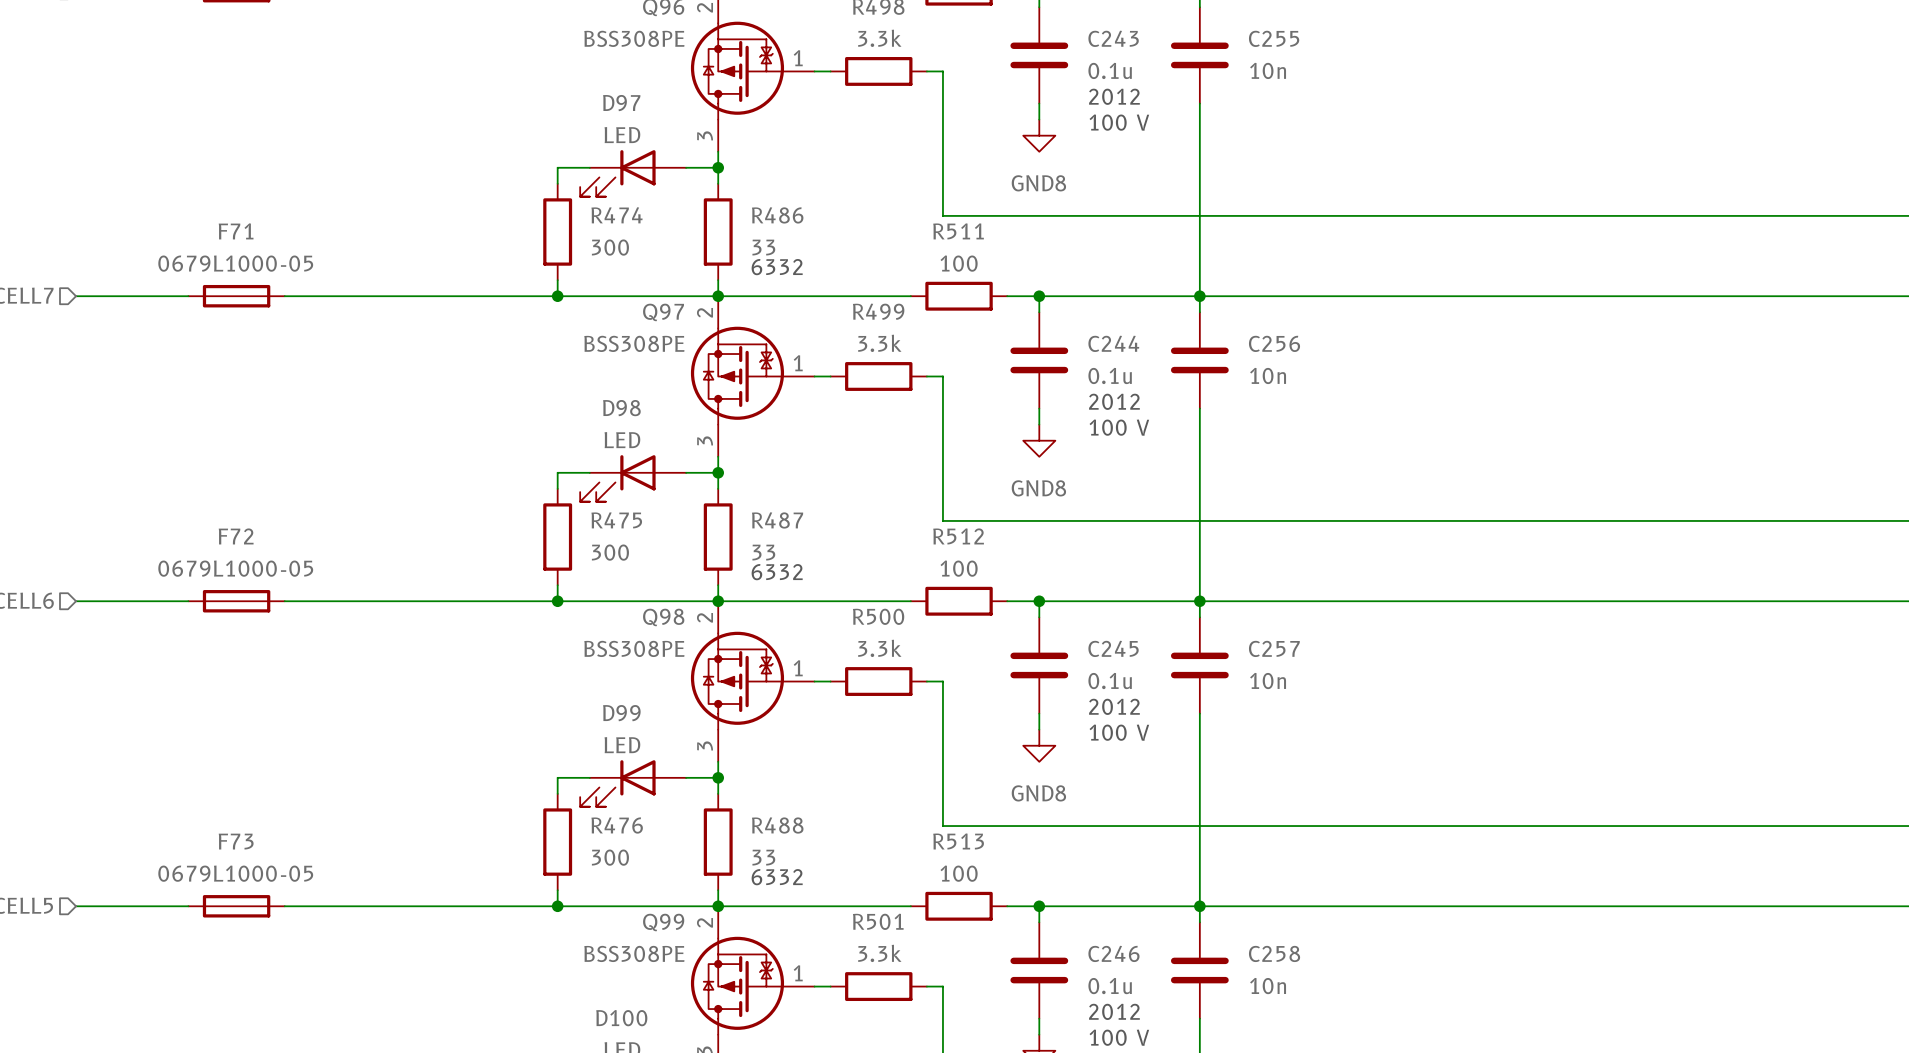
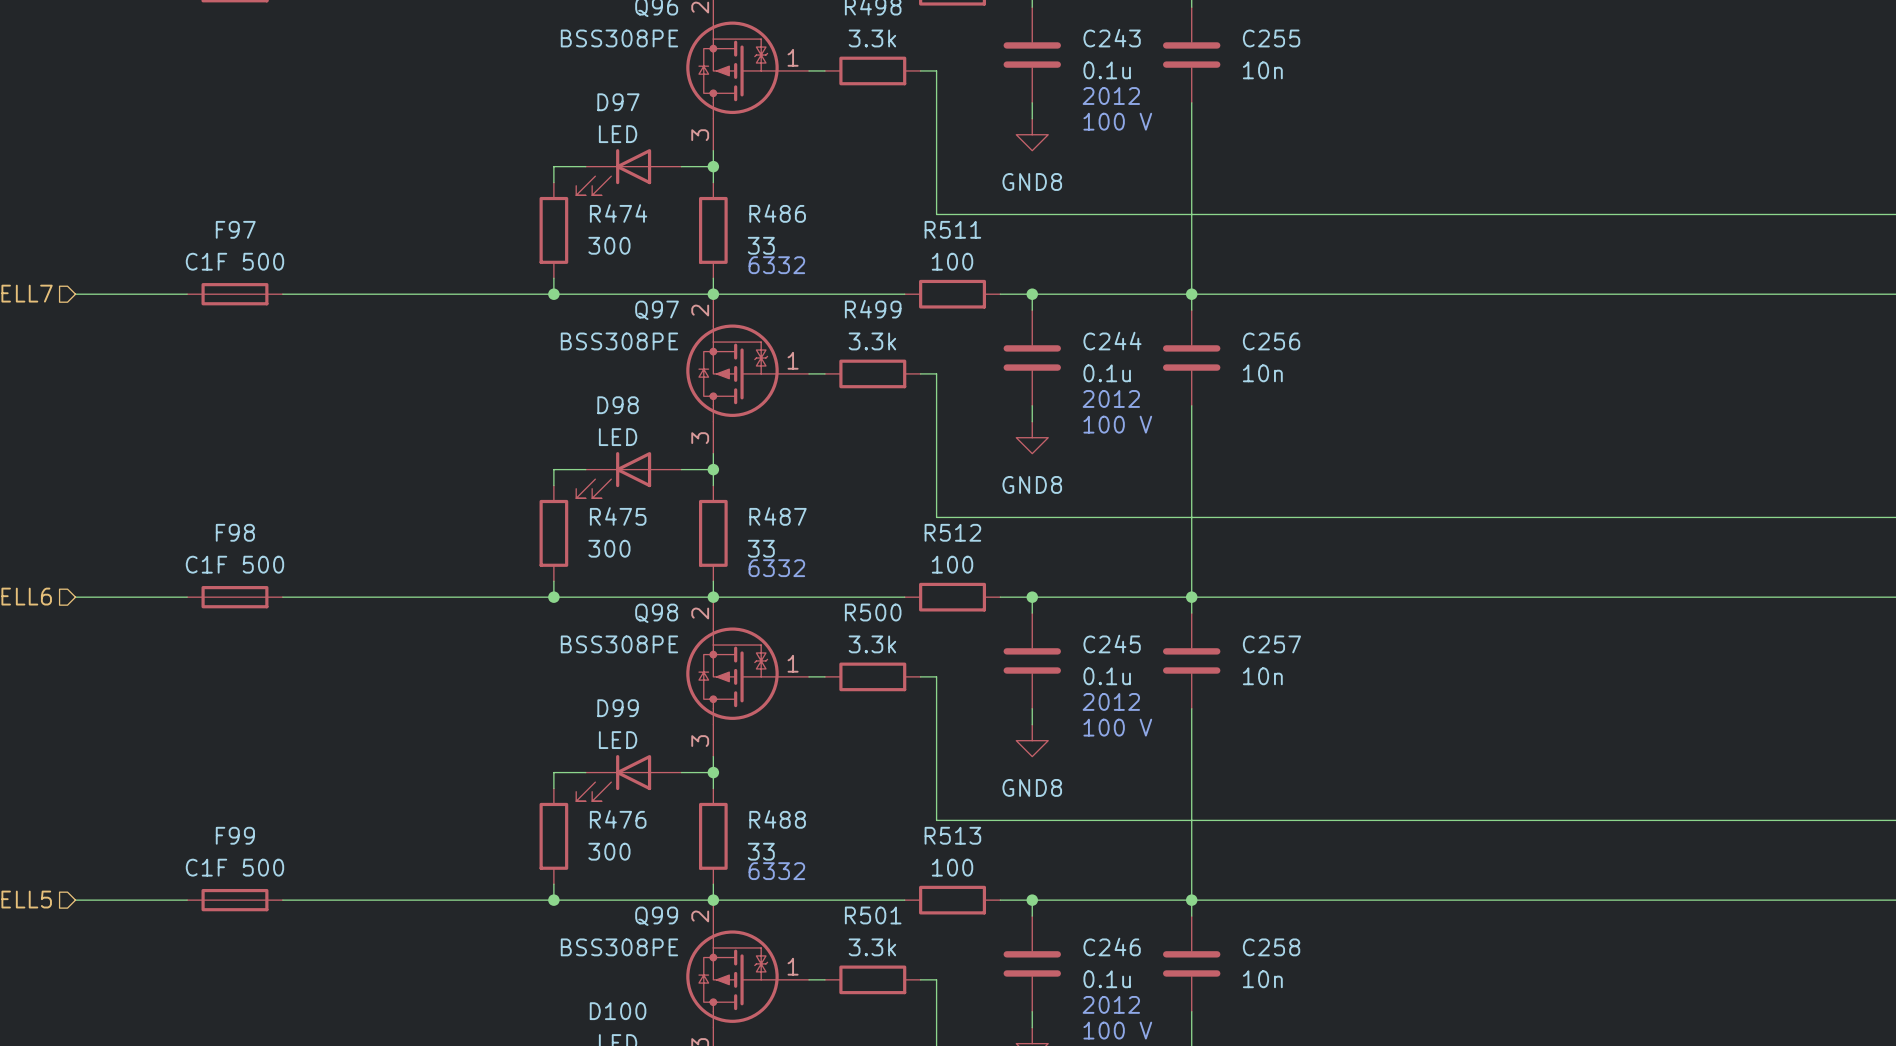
F71 name: F71 (236, 231) -> F97 (235, 229)
F71 value: 0679L1000-05 (235, 263) -> C1F 500 (234, 261)
F72 name: F72 (236, 536) -> F98 (235, 532)
F72 value: 0679L1000-05 (235, 568) -> C1F 500 (234, 564)
F73 name: F73 (236, 841) -> F99 (235, 835)
F73 value: 0679L1000-05 (235, 873) -> C1F 500 (234, 867)

